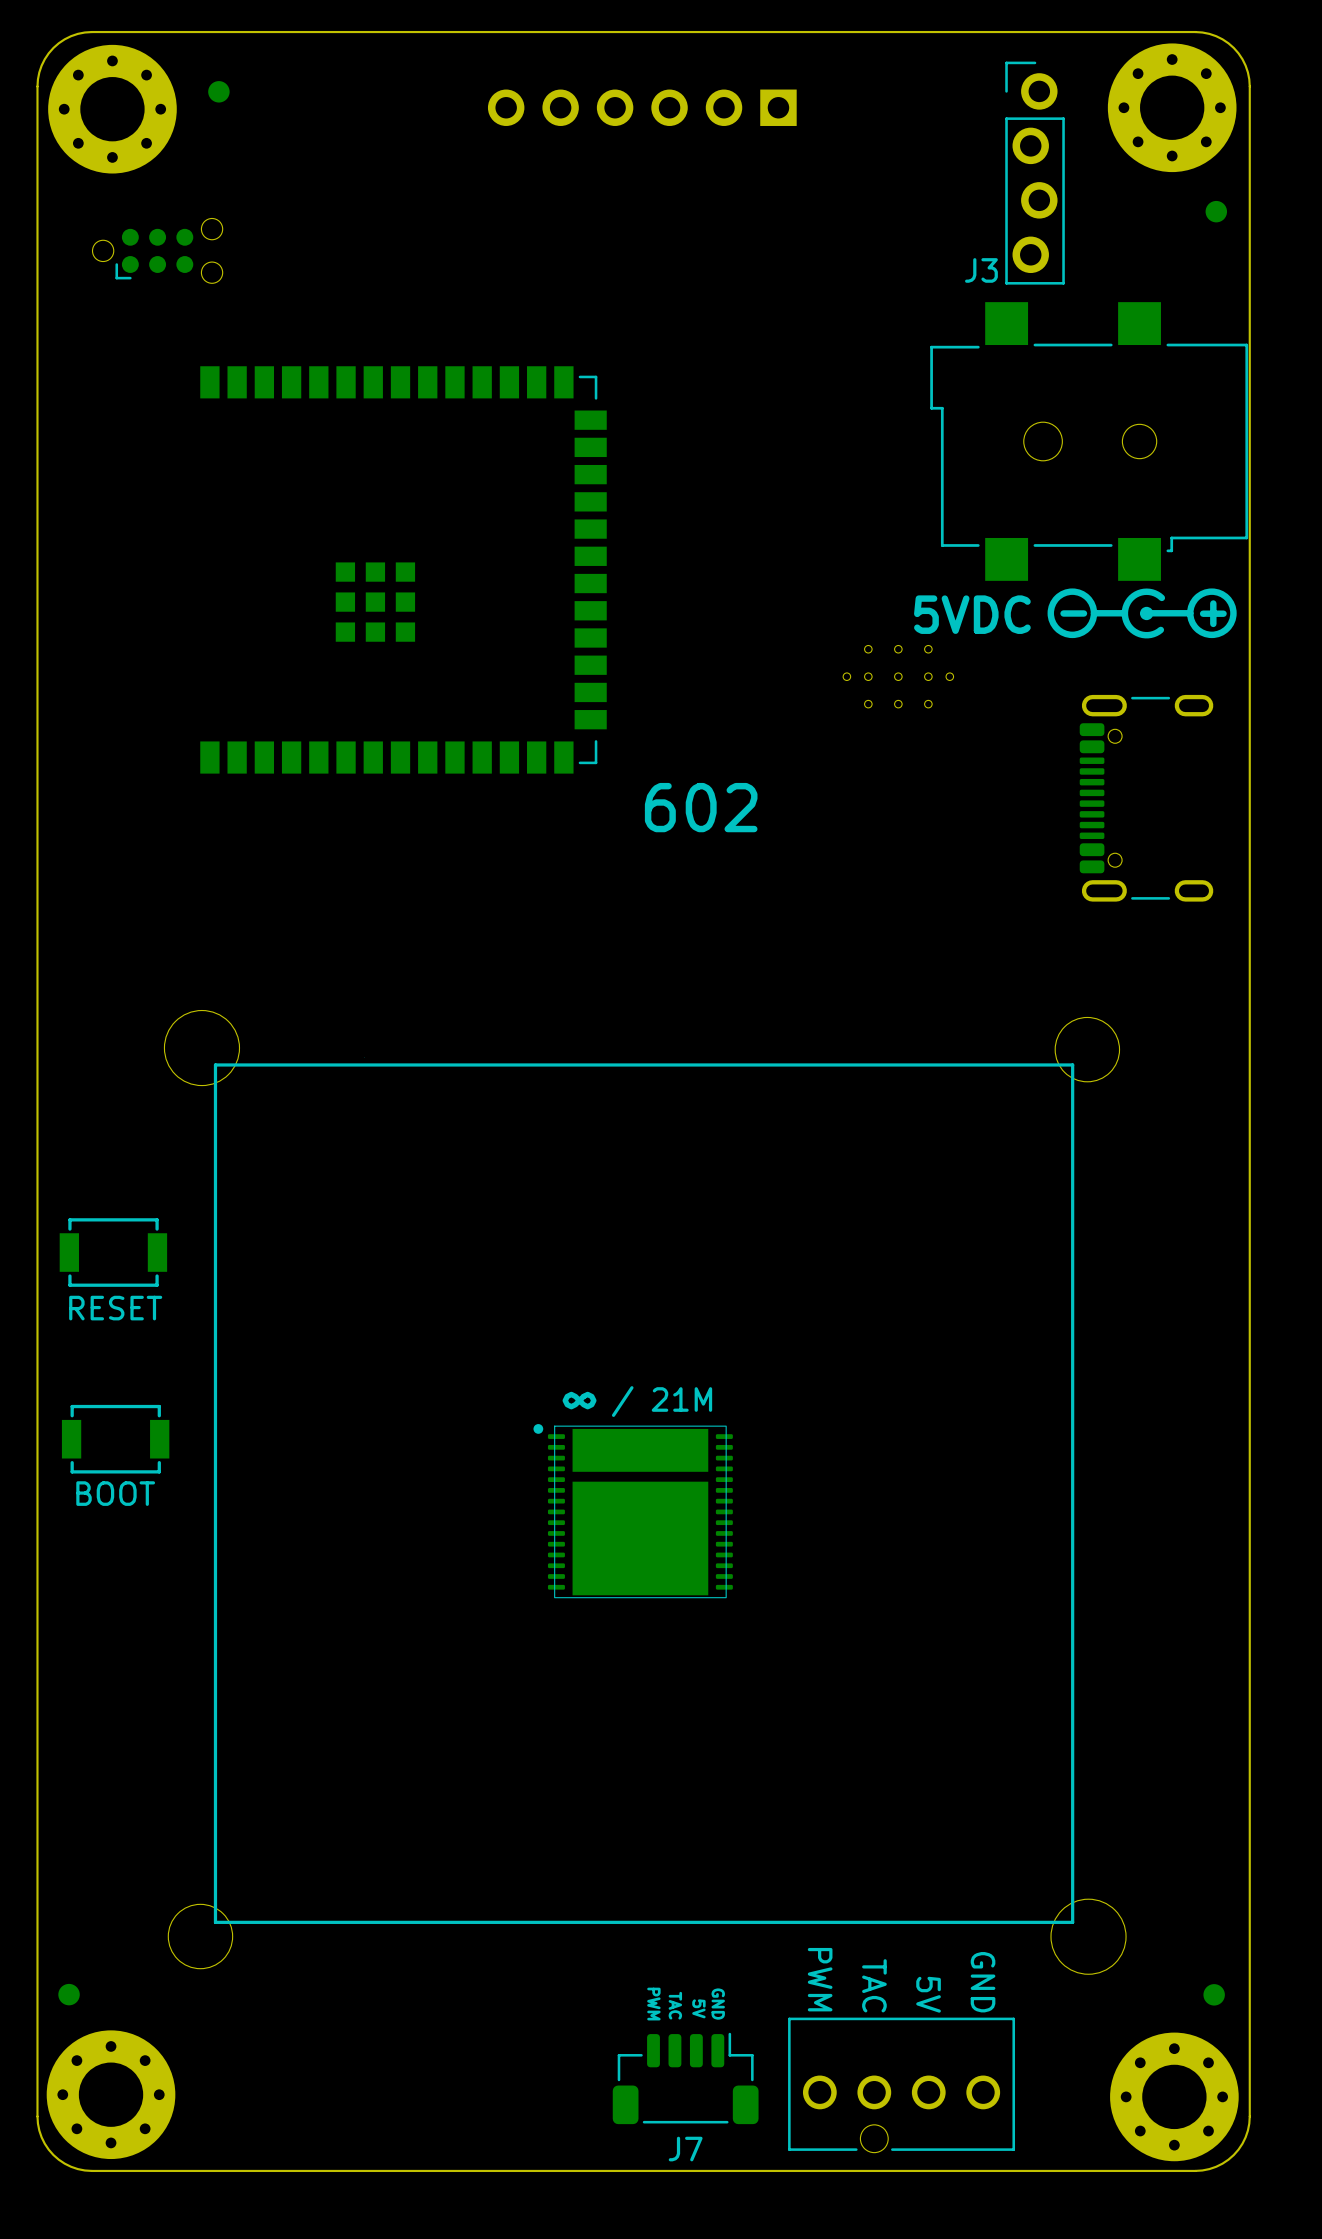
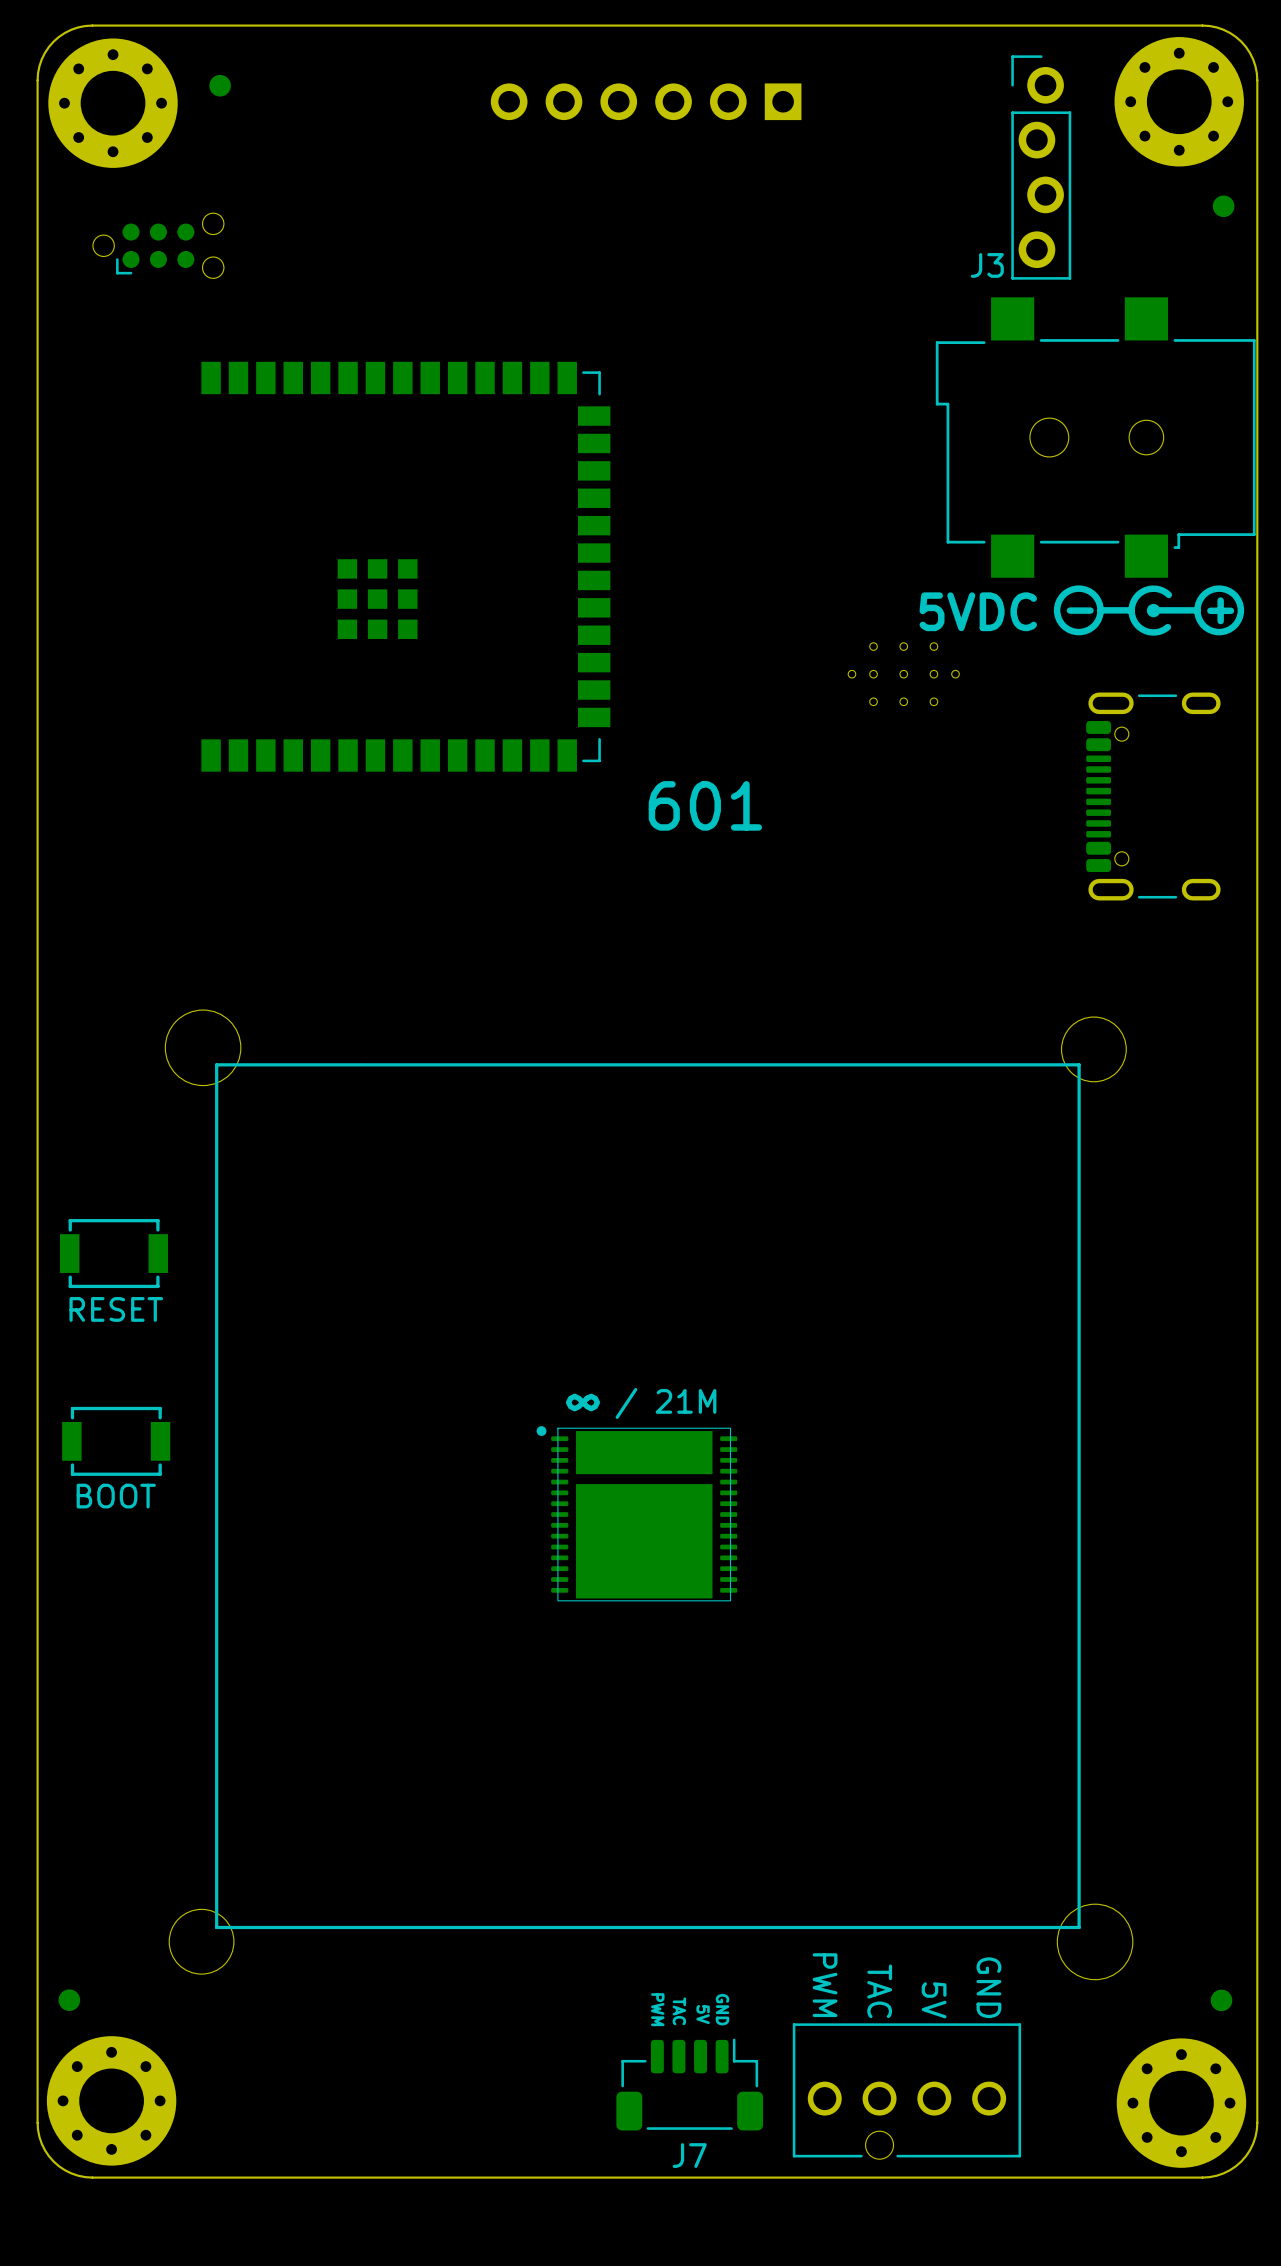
text: 602 (701, 807) -> 601 (705, 805)

